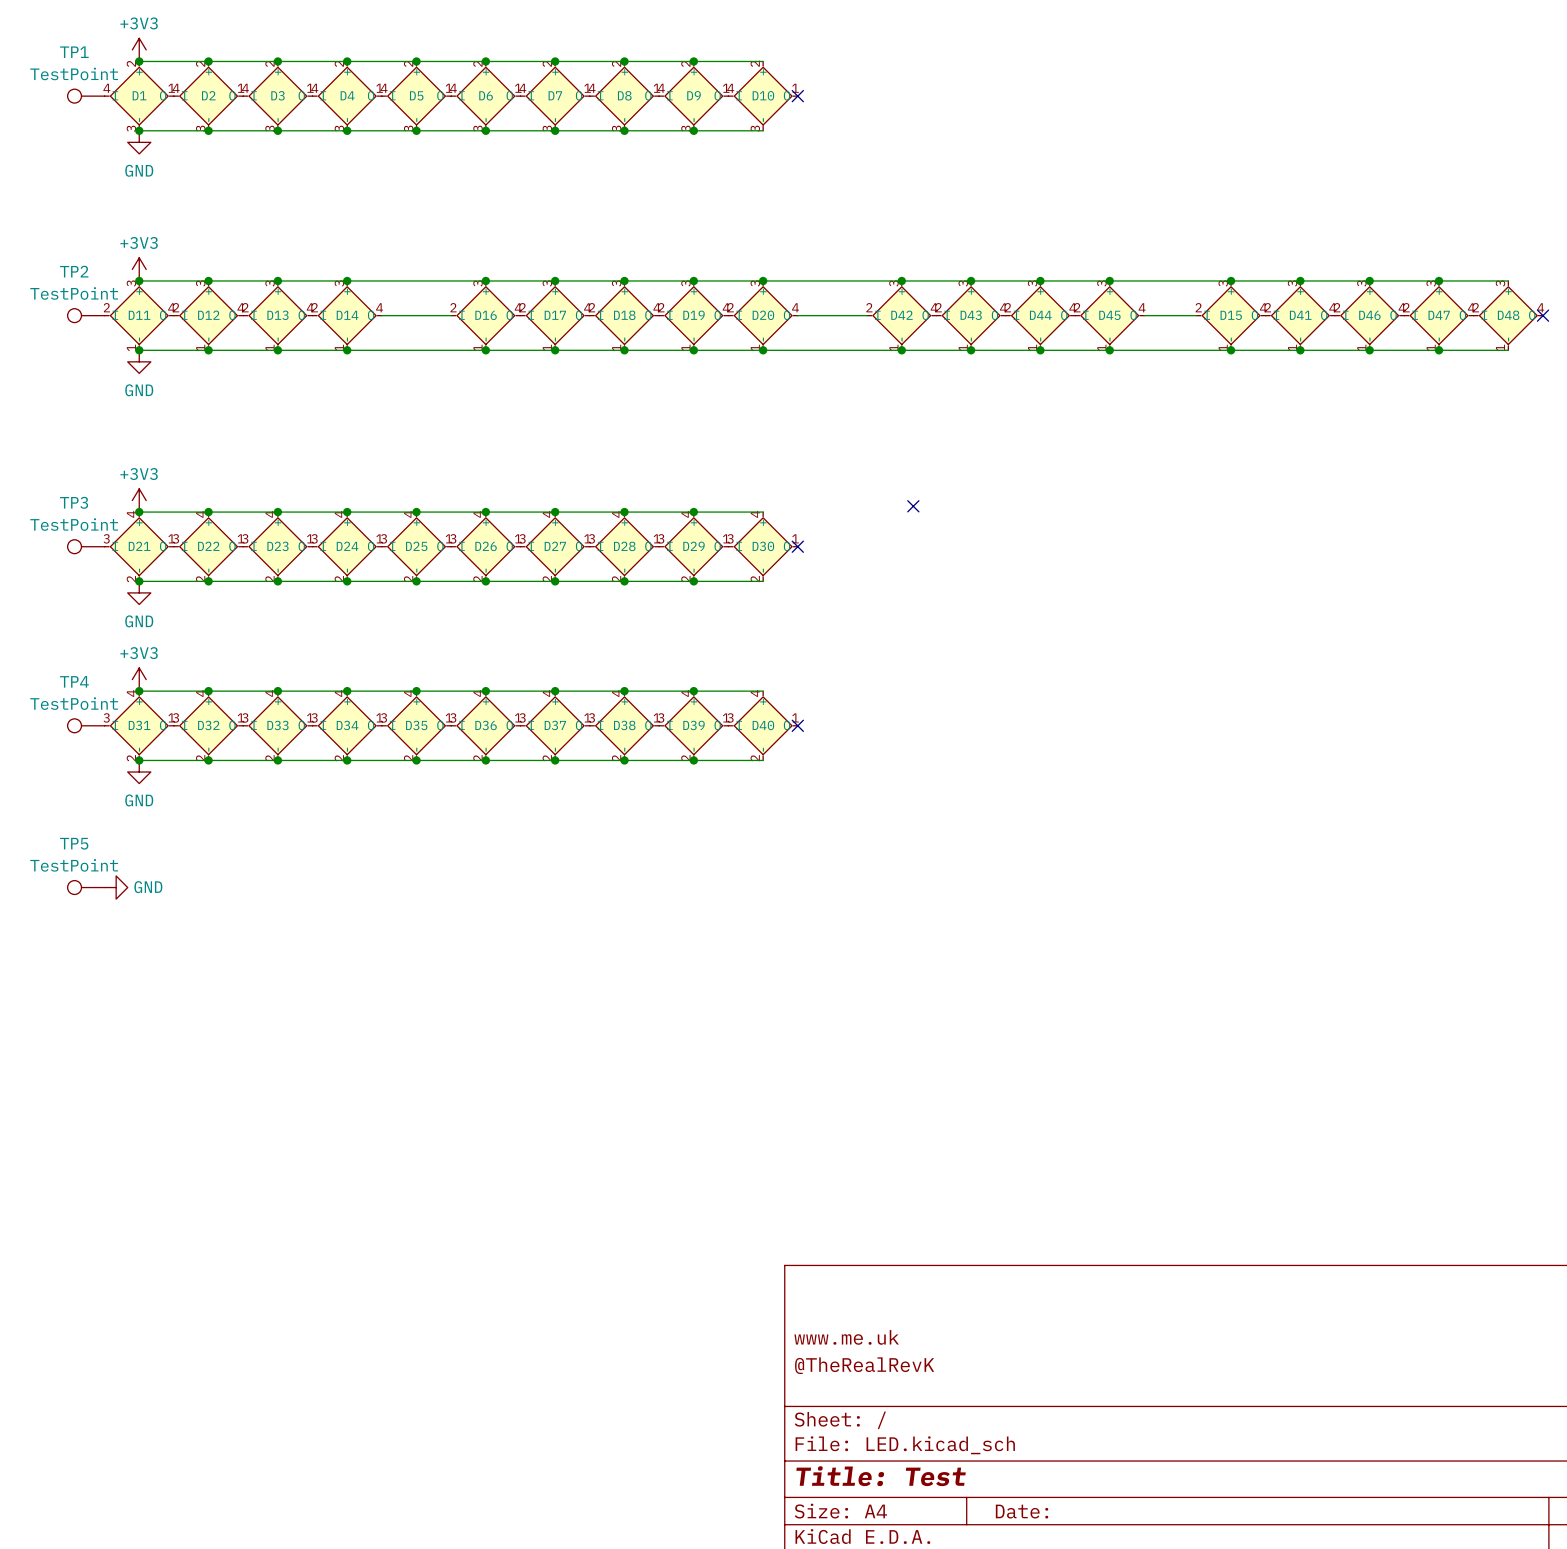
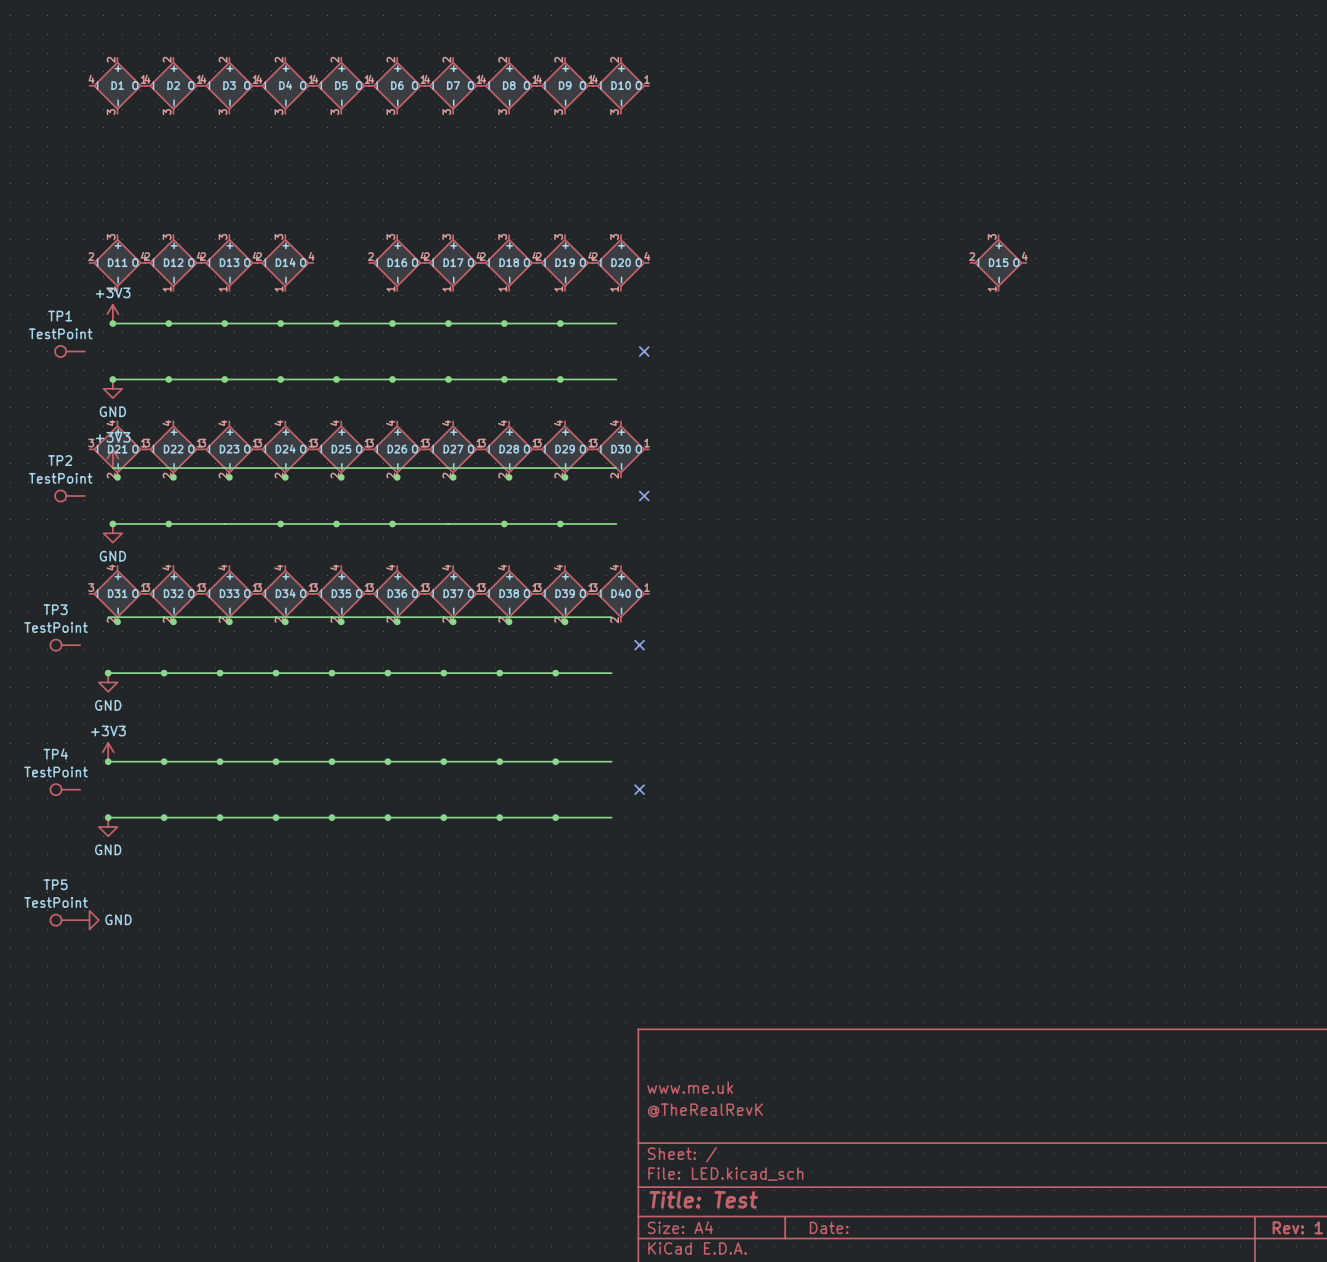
power symbol: +3V3 (139, 49) -> none
wire: (139, 61) (763, 61) -> none
junction: (139, 61) -> none
junction: (208, 61) -> none
junction: (277, 61) -> none
junction: (347, 61) -> none
junction: (416, 61) -> none
junction: (485, 61) -> none
junction: (555, 61) -> none
junction: (624, 61) -> none
junction: (693, 61) -> none
TP1 position: (86, 96) -> (69, 351)
no-connect mark: (797, 96) -> none
wire: (139, 130) (763, 130) -> none
junction: (139, 130) -> none
junction: (208, 130) -> none
junction: (277, 130) -> none
junction: (347, 130) -> none
junction: (416, 130) -> none
junction: (485, 130) -> none
junction: (555, 130) -> none
junction: (624, 130) -> none
junction: (693, 130) -> none
power symbol: GND (139, 142) -> none
power symbol: +3V3 (139, 269) -> none
wire: (139, 280) (1508, 280) -> none
junction: (139, 280) -> none
junction: (208, 280) -> none
junction: (277, 280) -> none
junction: (347, 280) -> none
junction: (485, 280) -> none
junction: (555, 280) -> none
junction: (624, 280) -> none
junction: (693, 280) -> none
junction: (763, 280) -> none
junction: (901, 280) -> none
junction: (971, 280) -> none
junction: (1040, 280) -> none
junction: (1109, 280) -> none
junction: (1231, 280) -> none
junction: (1300, 280) -> none
junction: (1369, 280) -> none
junction: (1439, 280) -> none
TP2 position: (86, 315) -> (69, 496)
wire: (381, 315) (451, 315) -> none
wire: (797, 315) (867, 315) -> none
D42: (901, 315) -> none
D43: (971, 315) -> none
D44: (1040, 315) -> none
D45: (1109, 315) -> none
wire: (1144, 315) (1196, 315) -> none
D41: (1300, 315) -> none
D46: (1369, 315) -> none
D47: (1439, 315) -> none
D48: (1508, 315) -> none
no-connect mark: (1542, 315) -> none
wire: (139, 350) (1508, 350) -> none
junction: (139, 350) -> none
junction: (208, 350) -> none
junction: (277, 350) -> none
junction: (347, 350) -> none
junction: (485, 350) -> none
junction: (555, 350) -> none
junction: (624, 350) -> none
junction: (693, 350) -> none
junction: (763, 350) -> none
junction: (901, 350) -> none
junction: (971, 350) -> none
junction: (1040, 350) -> none
junction: (1109, 350) -> none
junction: (1231, 350) -> none
junction: (1300, 350) -> none
junction: (1369, 350) -> none
junction: (1439, 350) -> none
power symbol: GND (139, 361) -> none
power symbol: none -> +3V3 (112, 314)
junction: none -> (112, 323)
junction: none -> (168, 323)
junction: none -> (224, 323)
junction: none -> (280, 323)
junction: none -> (336, 323)
junction: none -> (392, 323)
junction: none -> (448, 323)
junction: none -> (504, 323)
junction: none -> (560, 323)
no-connect mark: none -> (644, 351)
junction: none -> (112, 379)
junction: none -> (168, 379)
junction: none -> (224, 379)
junction: none -> (280, 379)
junction: none -> (336, 379)
junction: none -> (392, 379)
junction: none -> (448, 379)
junction: none -> (504, 379)
junction: none -> (560, 379)
power symbol: none -> GND (112, 388)
power symbol position: +3V3 (139, 500) -> +3V3 (112, 458)
no-connect mark: (913, 506) -> none
wire: (139, 512) (763, 512) -> (112, 323) (616, 323)
junction: (139, 512) -> none
junction: (208, 512) -> none
junction: (277, 512) -> none
junction: (347, 512) -> none
junction: (416, 512) -> none
junction: (485, 512) -> none
junction: (555, 512) -> none
junction: (624, 512) -> none
junction: (693, 512) -> none
TP3 position: (86, 546) -> (65, 645)
no-connect mark: (797, 546) -> none
wire: (139, 581) (763, 581) -> (112, 379) (616, 379)
power symbol position: GND (139, 592) -> GND (112, 533)
no-connect mark: none -> (644, 496)
junction: none -> (112, 523)
junction: none -> (168, 523)
junction: none -> (280, 523)
junction: none -> (336, 523)
junction: none -> (392, 523)
junction: none -> (504, 523)
junction: none -> (560, 523)
power symbol: +3V3 (139, 679) -> none
wire: (139, 691) (763, 691) -> (112, 468) (616, 468)
junction: (139, 691) -> none
junction: (208, 691) -> none
junction: (277, 691) -> none
junction: (347, 691) -> none
junction: (416, 691) -> none
junction: (485, 691) -> none
junction: (555, 691) -> none
junction: (624, 691) -> none
junction: (693, 691) -> none
TP4 position: (86, 725) -> (65, 789)
no-connect mark: (797, 725) -> none
wire: none -> (108, 617) (611, 617)
wire: (139, 760) (763, 760) -> (112, 523) (616, 523)
power symbol: GND (139, 772) -> none
no-connect mark: none -> (639, 645)
wire: none -> (108, 673) (611, 673)
junction: none -> (108, 673)
junction: none -> (164, 673)
junction: none -> (220, 673)
junction: none -> (276, 673)
junction: none -> (331, 673)
junction: none -> (387, 673)
junction: none -> (443, 673)
junction: none -> (499, 673)
junction: none -> (555, 673)
power symbol: none -> GND (108, 682)
TP5 position: (86, 887) -> (65, 920)
power symbol: GND (116, 887) -> none
power symbol: none -> +3V3 (108, 752)
wire: none -> (108, 761) (611, 761)
junction: none -> (108, 761)
junction: none -> (164, 761)
junction: none -> (220, 761)
junction: none -> (276, 761)
junction: none -> (331, 761)
junction: none -> (387, 761)
junction: none -> (443, 761)
junction: none -> (499, 761)
junction: none -> (555, 761)
no-connect mark: none -> (639, 789)
wire: none -> (108, 817) (611, 817)
junction: none -> (108, 817)
junction: none -> (164, 817)
junction: none -> (220, 817)
junction: none -> (276, 817)
junction: none -> (331, 817)
junction: none -> (387, 817)
junction: none -> (443, 817)
junction: none -> (499, 817)
junction: none -> (555, 817)
power symbol: none -> GND (108, 826)
power symbol: none -> GND (89, 920)

